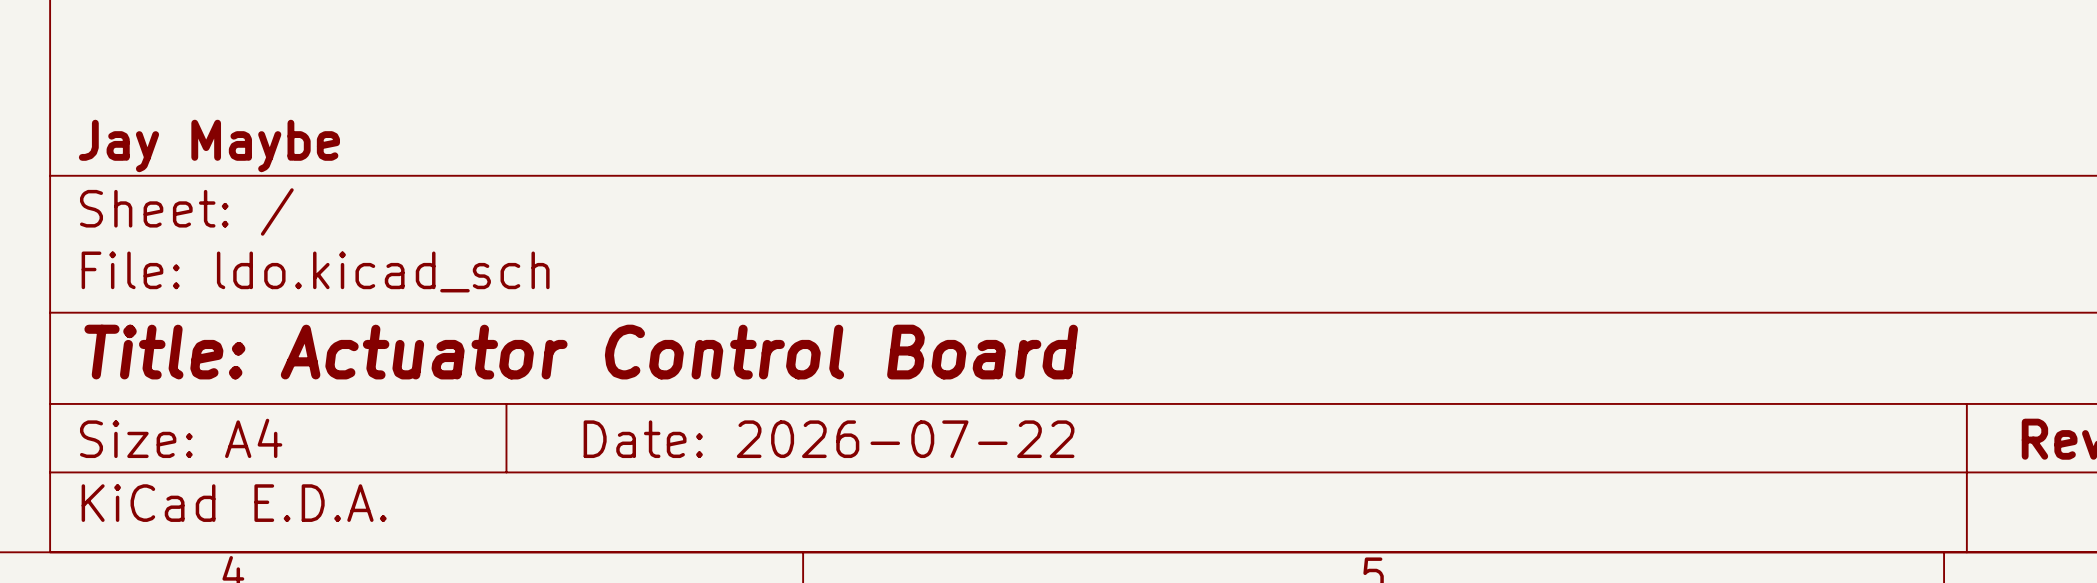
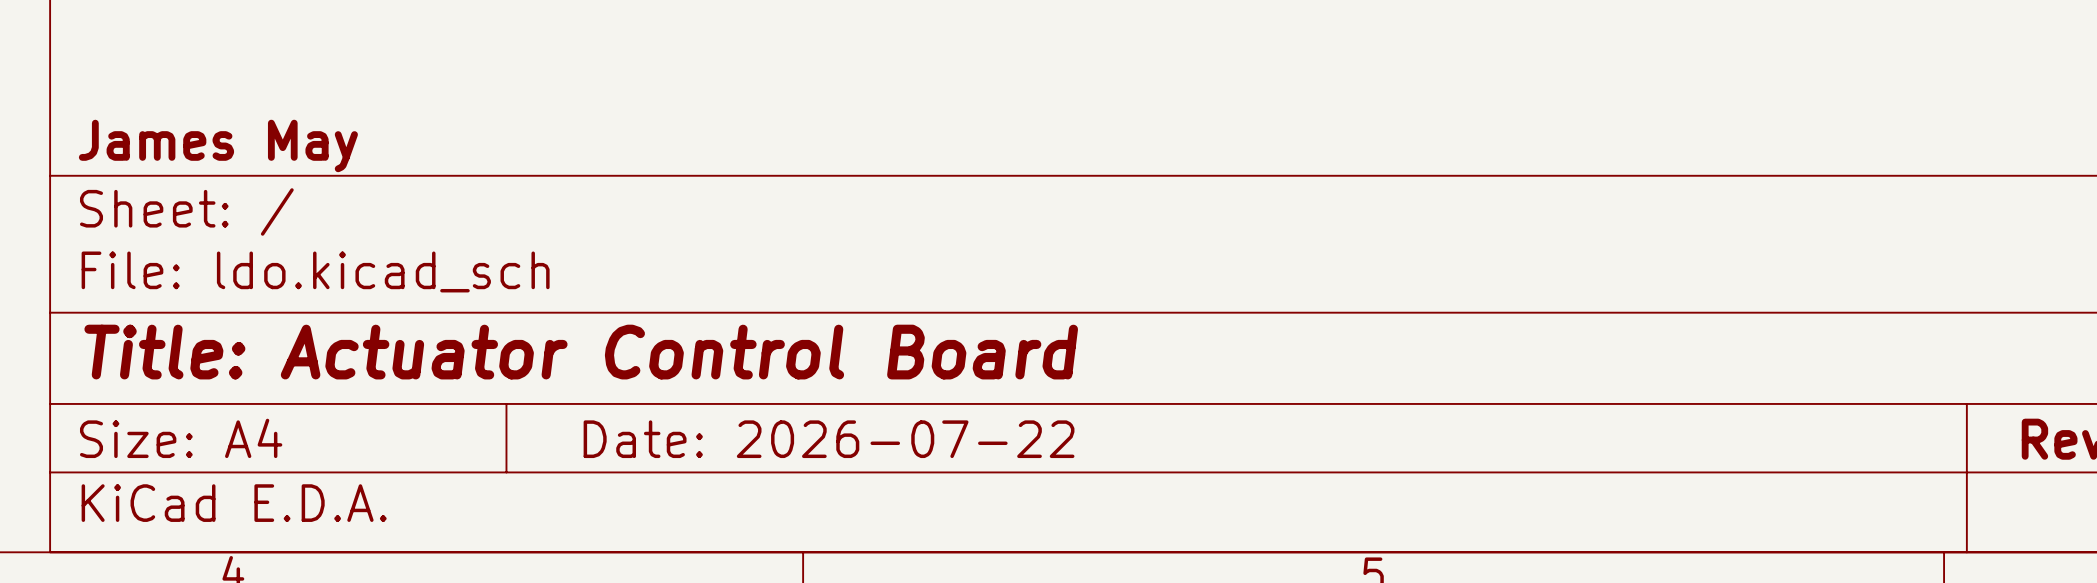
title block: Jay Maybe (209, 145) -> James May (218, 145)

